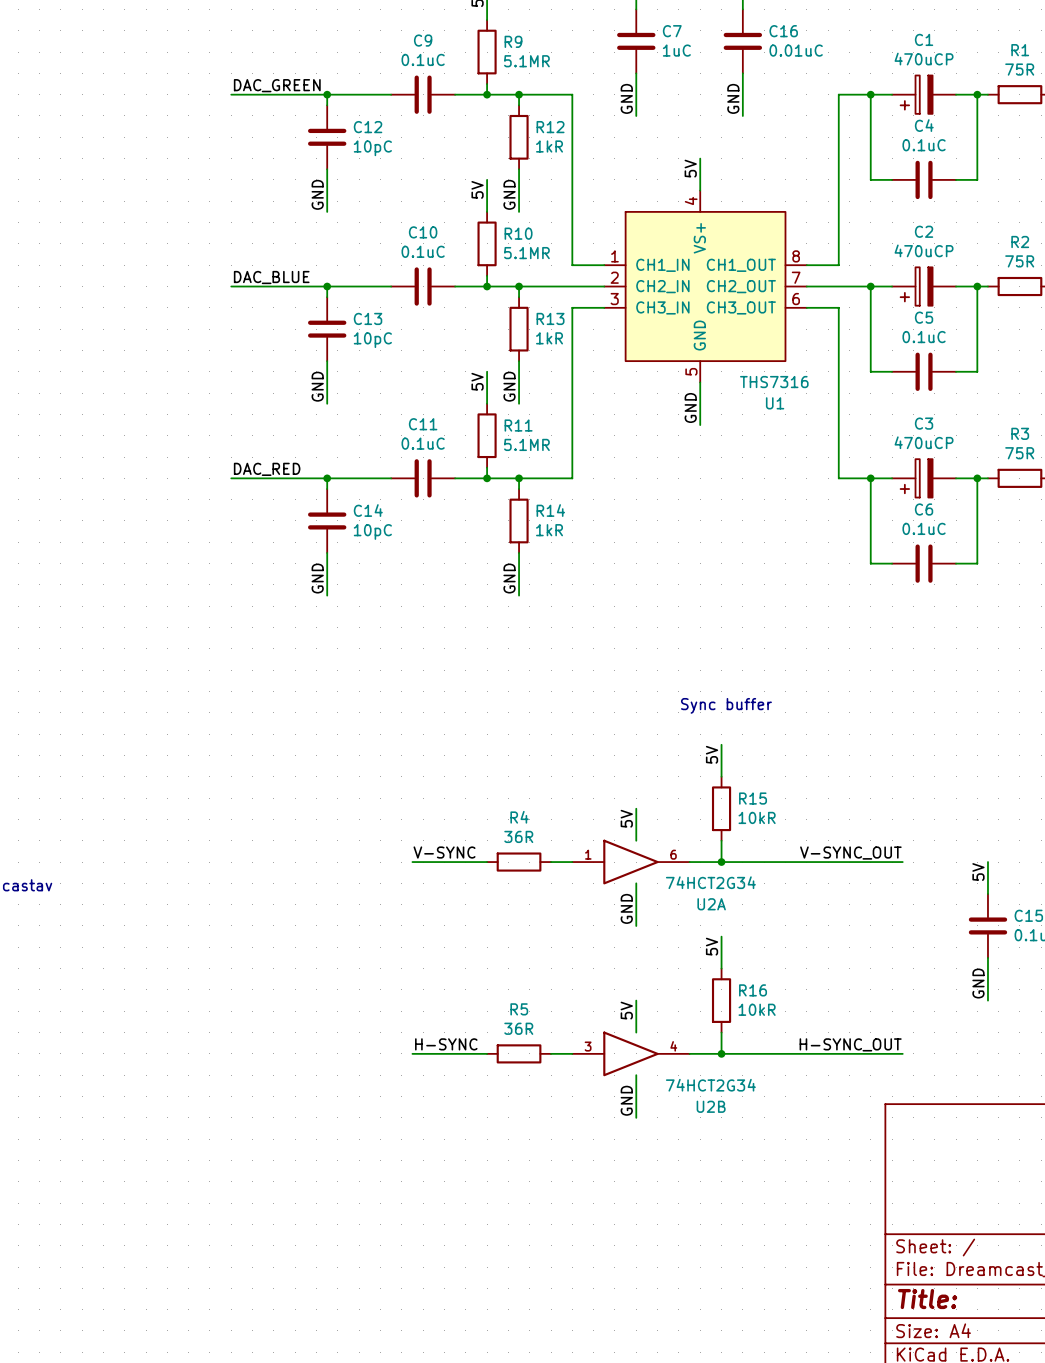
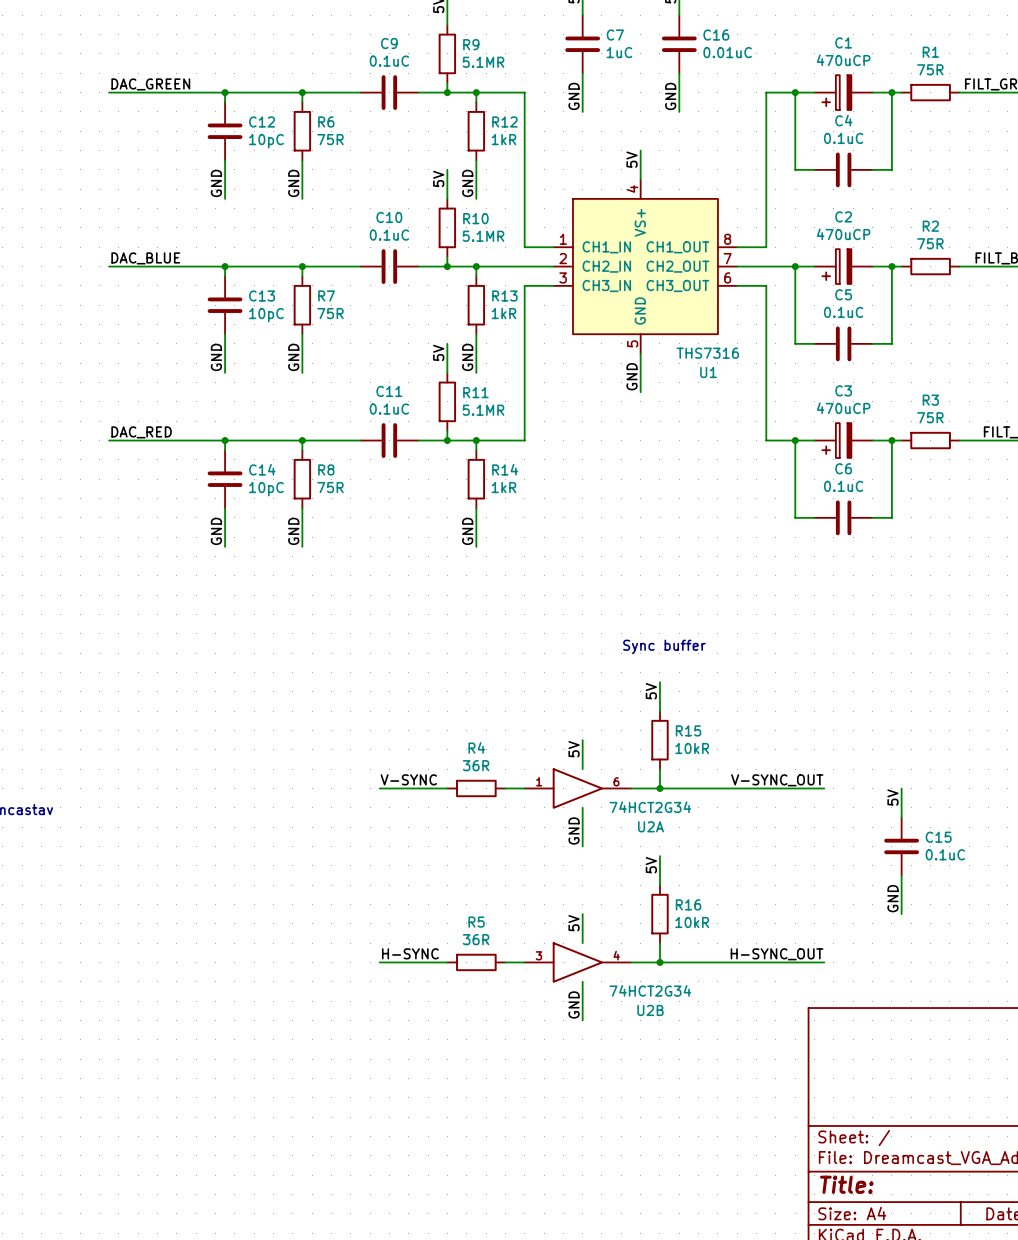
label position: DAC_GREEN (277, 85) -> DAC_GREEN (150, 84)
wire: none -> (109, 92) (215, 92)
wire: none -> (225, 92) (225, 102)
junction: none -> (225, 92)
C12 position: (327, 137) -> (225, 131)
R6: none -> 75R (302, 131)
wire: none -> (225, 160) (225, 198)
label: none -> GND (216, 183)
label position: DAC_BLUE (271, 277) -> DAC_BLUE (145, 258)
wire: none -> (109, 266) (215, 266)
wire: none -> (225, 266) (225, 276)
junction: none -> (225, 266)
C13 position: (327, 329) -> (225, 305)
R7: none -> 75R (302, 305)
wire: none -> (225, 334) (225, 372)
label: none -> GND (216, 357)
label position: DAC_RED (267, 469) -> DAC_RED (141, 432)
wire: none -> (109, 440) (215, 440)
wire: none -> (225, 440) (225, 450)
junction: none -> (225, 440)
C14 position: (327, 520) -> (225, 479)
R8: none -> 75R (302, 479)
wire: none -> (225, 508) (225, 546)
label: none -> GND (216, 531)

